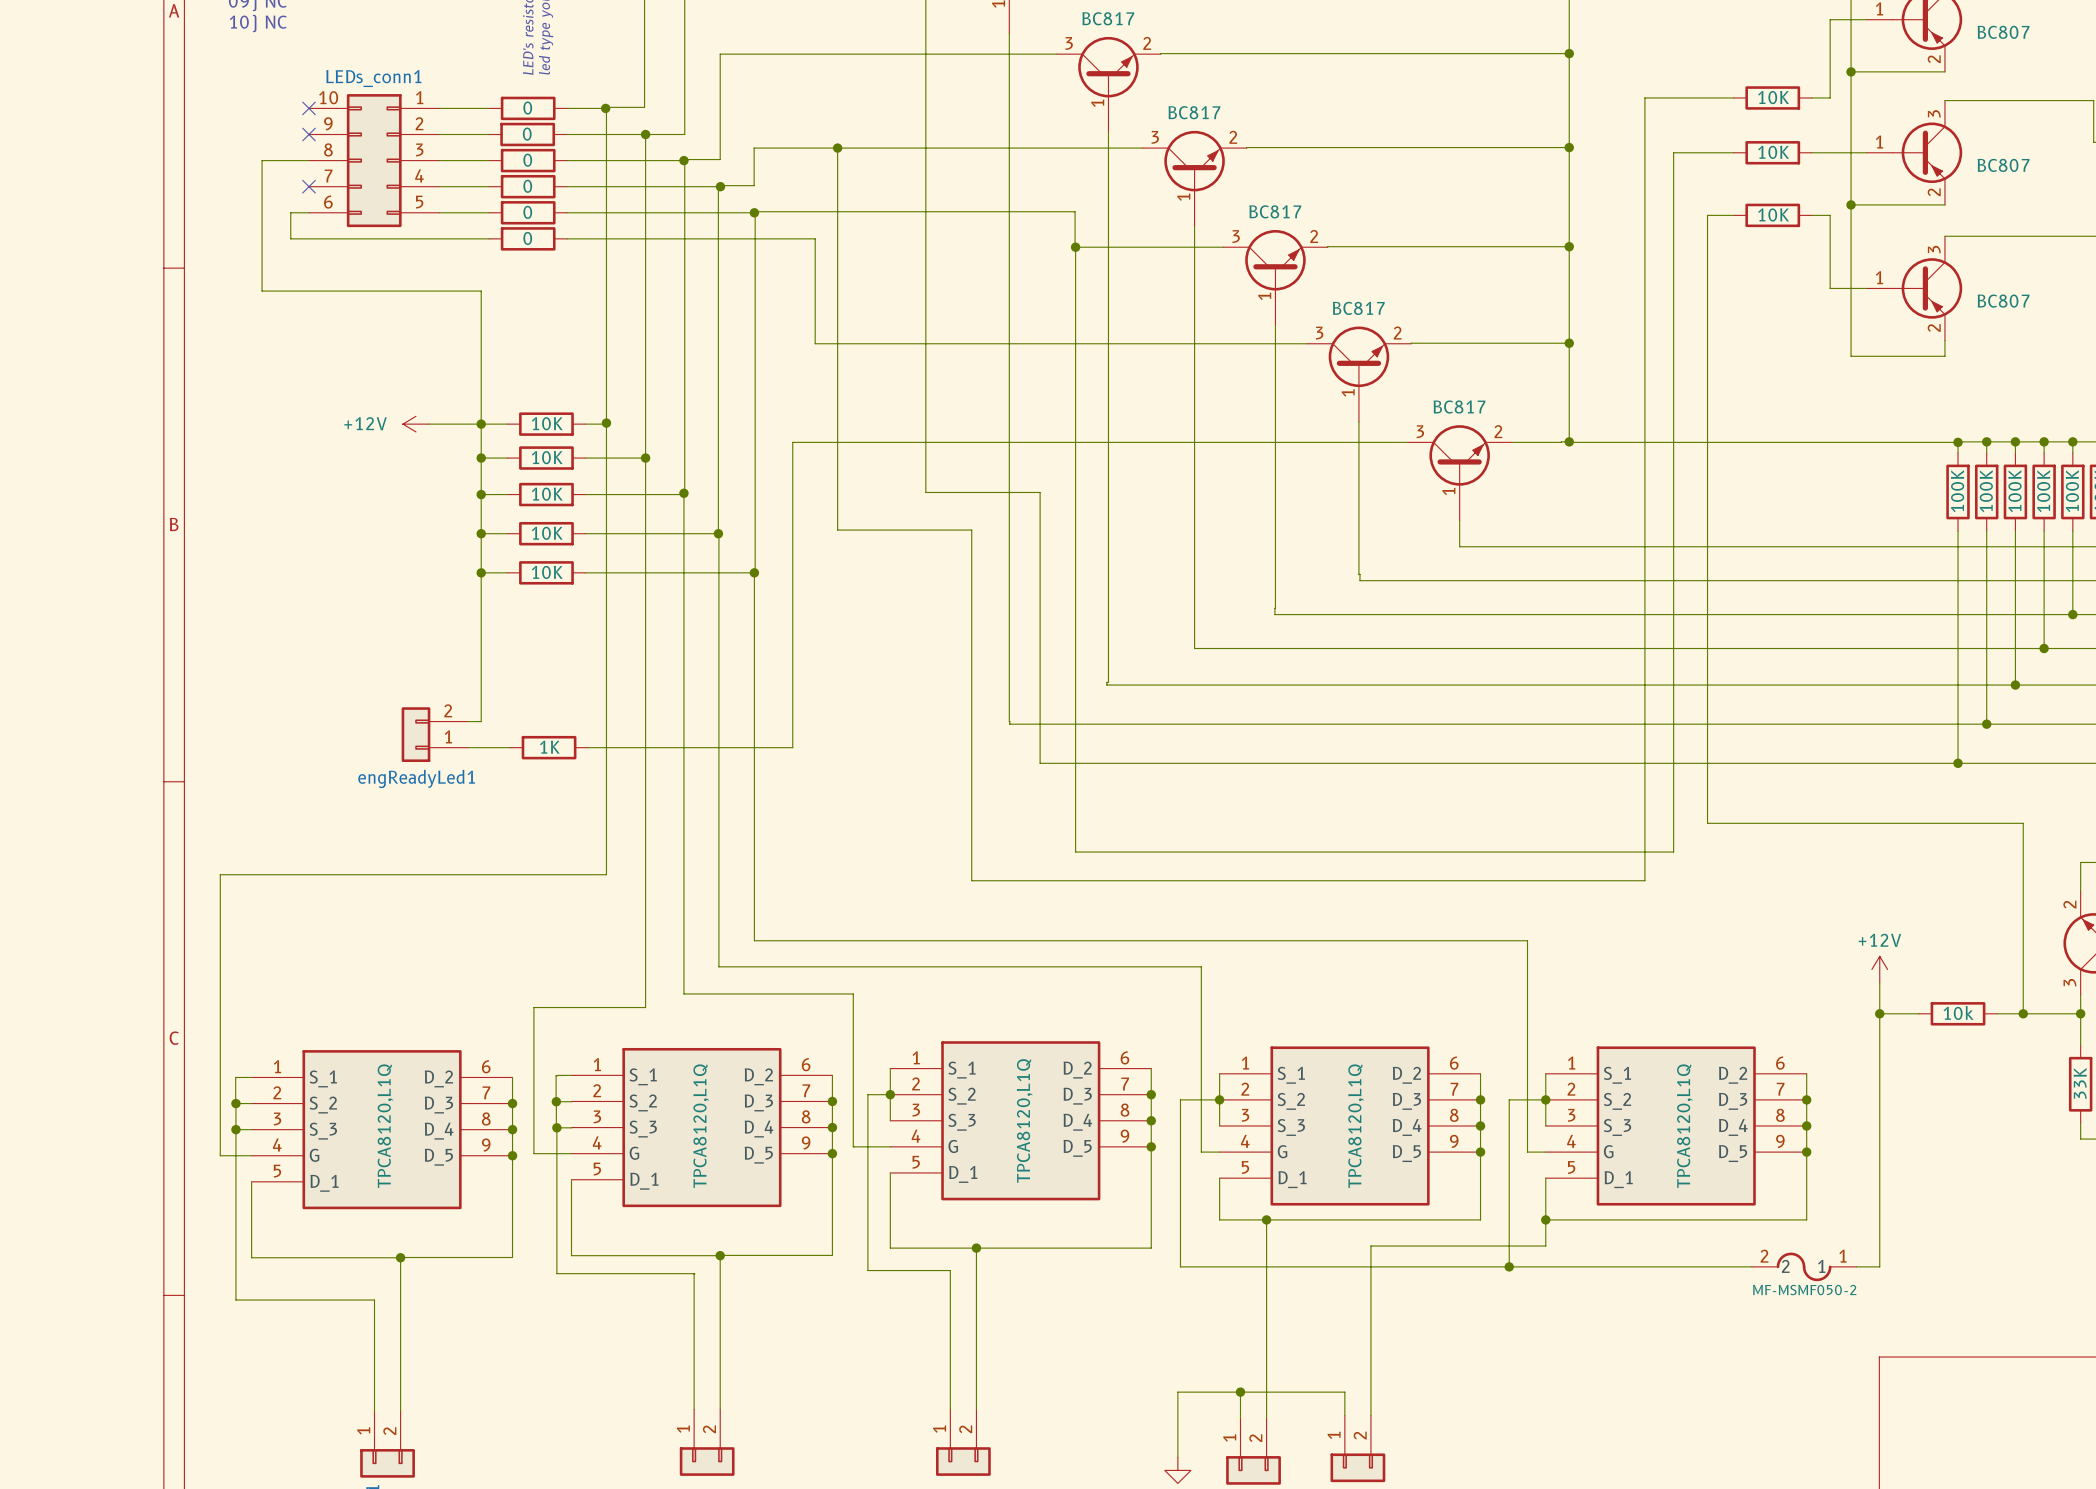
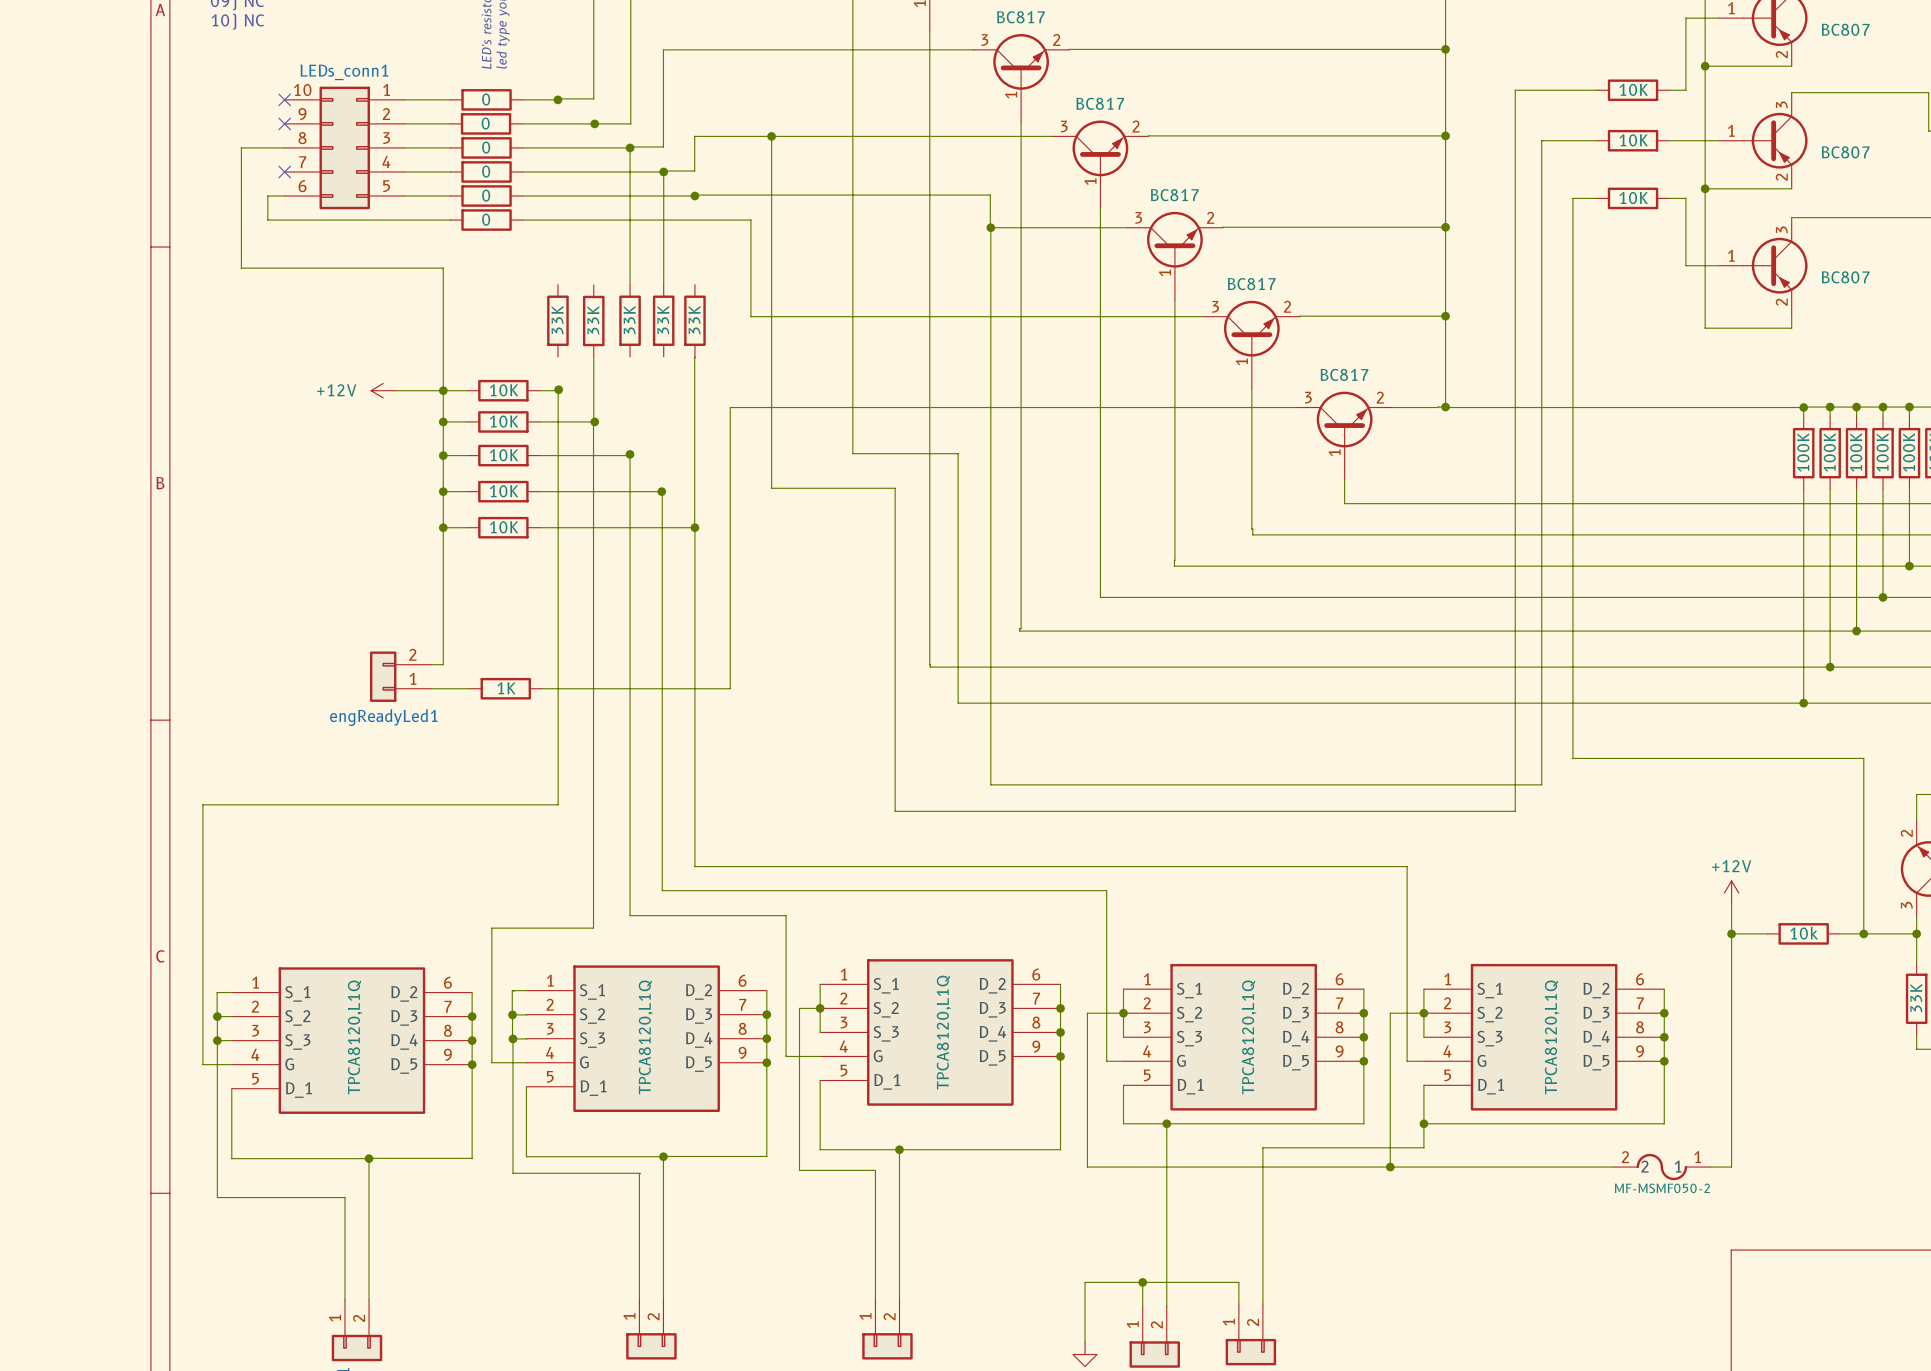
wire: (605, 108) (606, 874) (220, 874) -> (558, 389) (558, 804) (202, 805)
wire: (645, 134) (644, 1007) -> (593, 357) (593, 928)
wire: (683, 160) (683, 493) -> (630, 147) (630, 284)
wire: (720, 187) (718, 187) (718, 533) -> (663, 172) (663, 284)
wire: (754, 212) (754, 572) -> (694, 356) (694, 527)
part: none -> 33K (557, 320)
part: none -> 33K (593, 320)
part: none -> 33K (630, 320)
part: none -> 33K (663, 320)
part: none -> 33K (694, 320)

